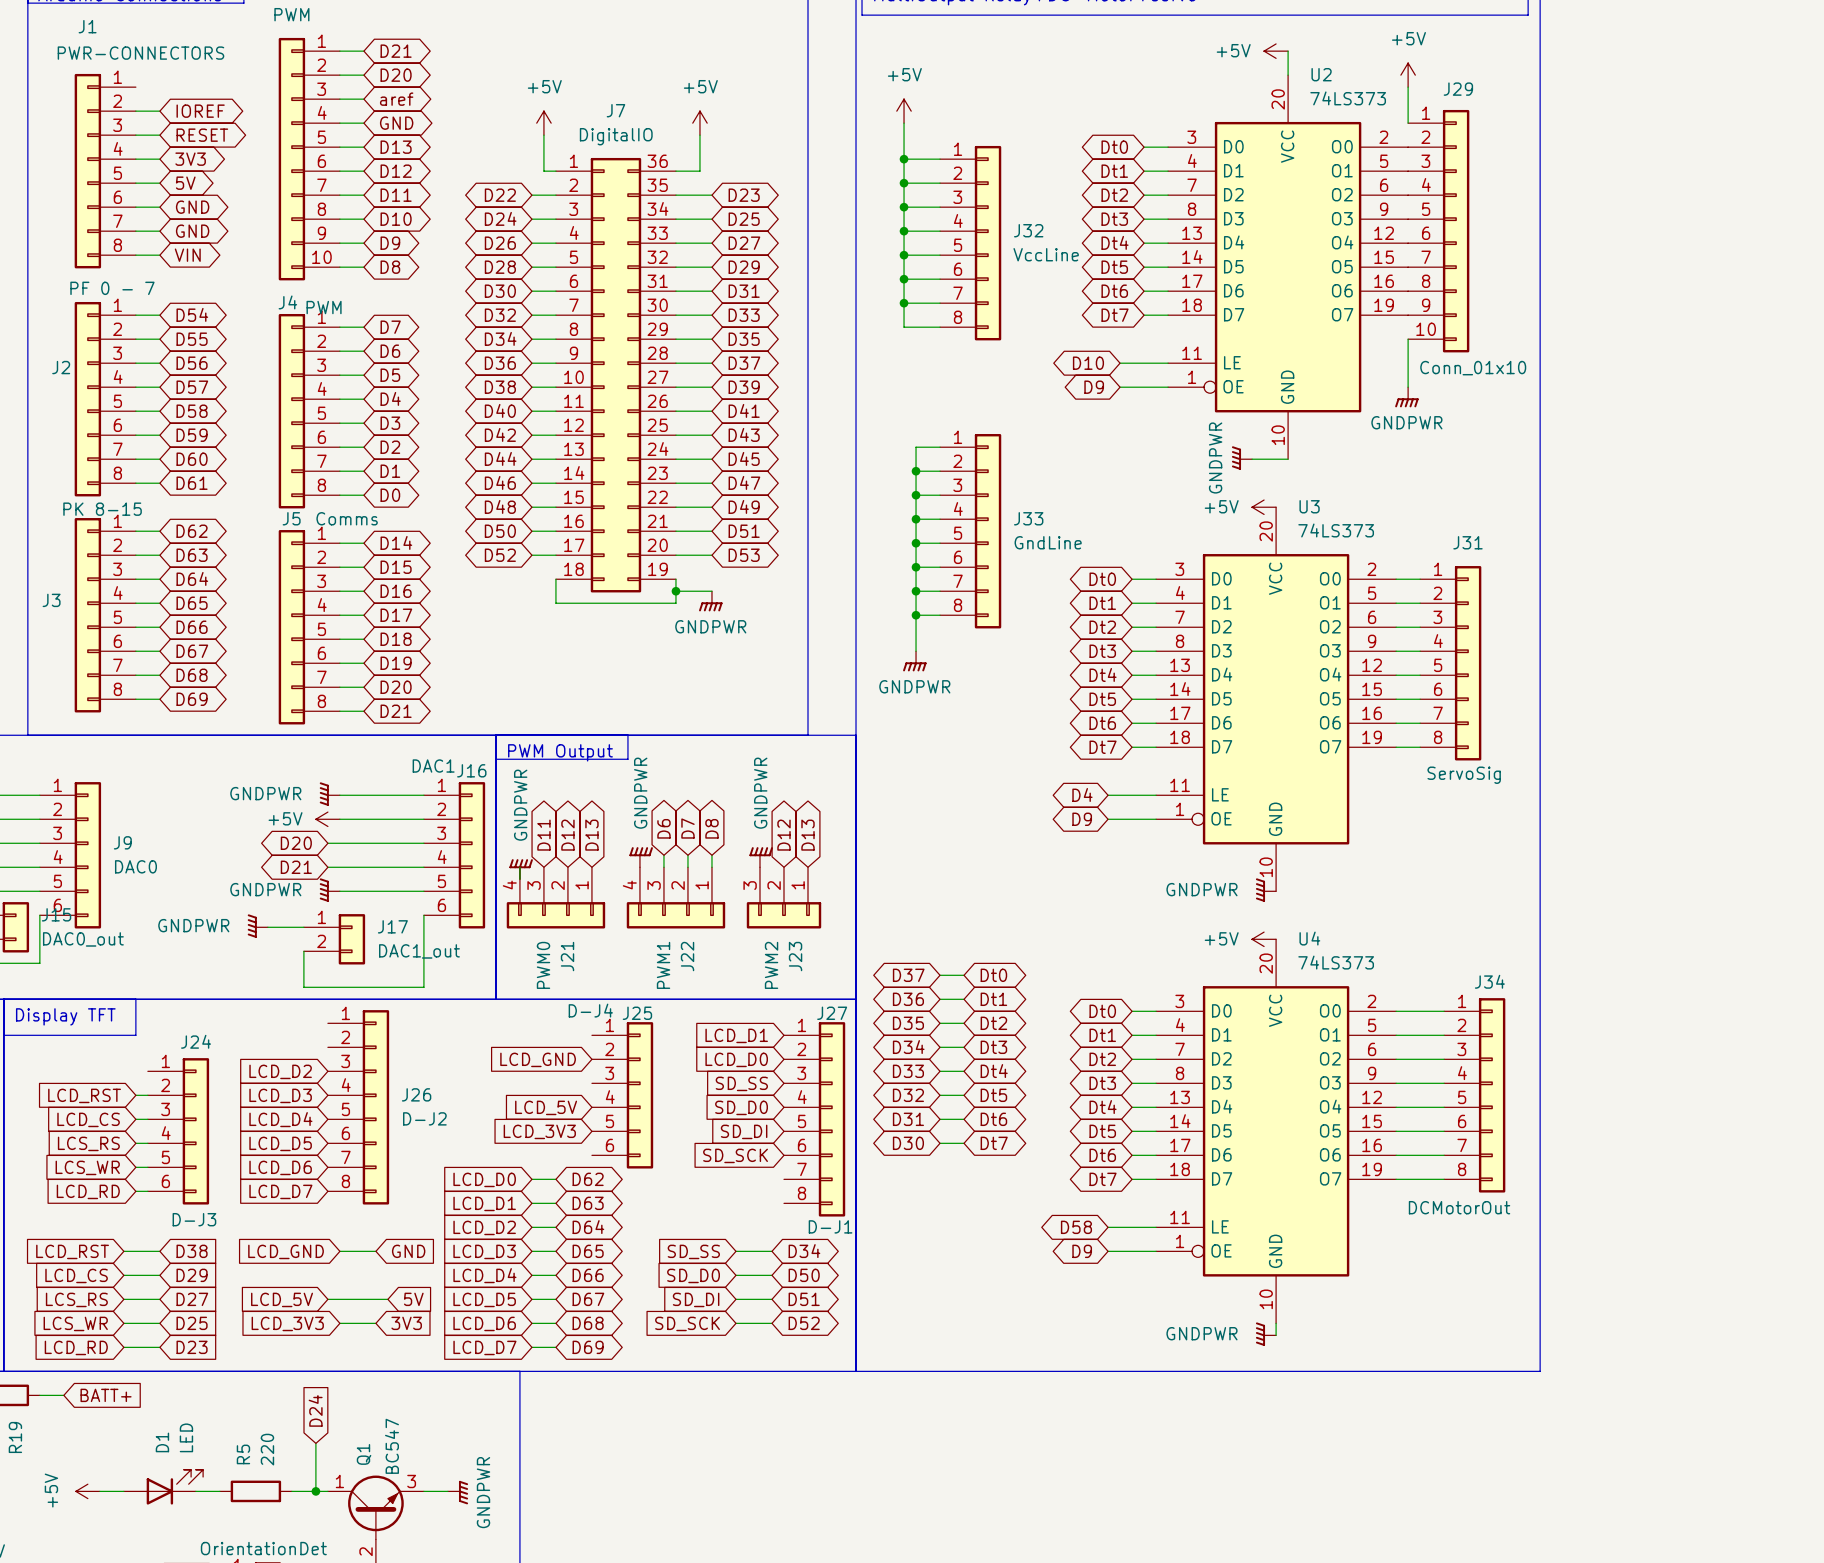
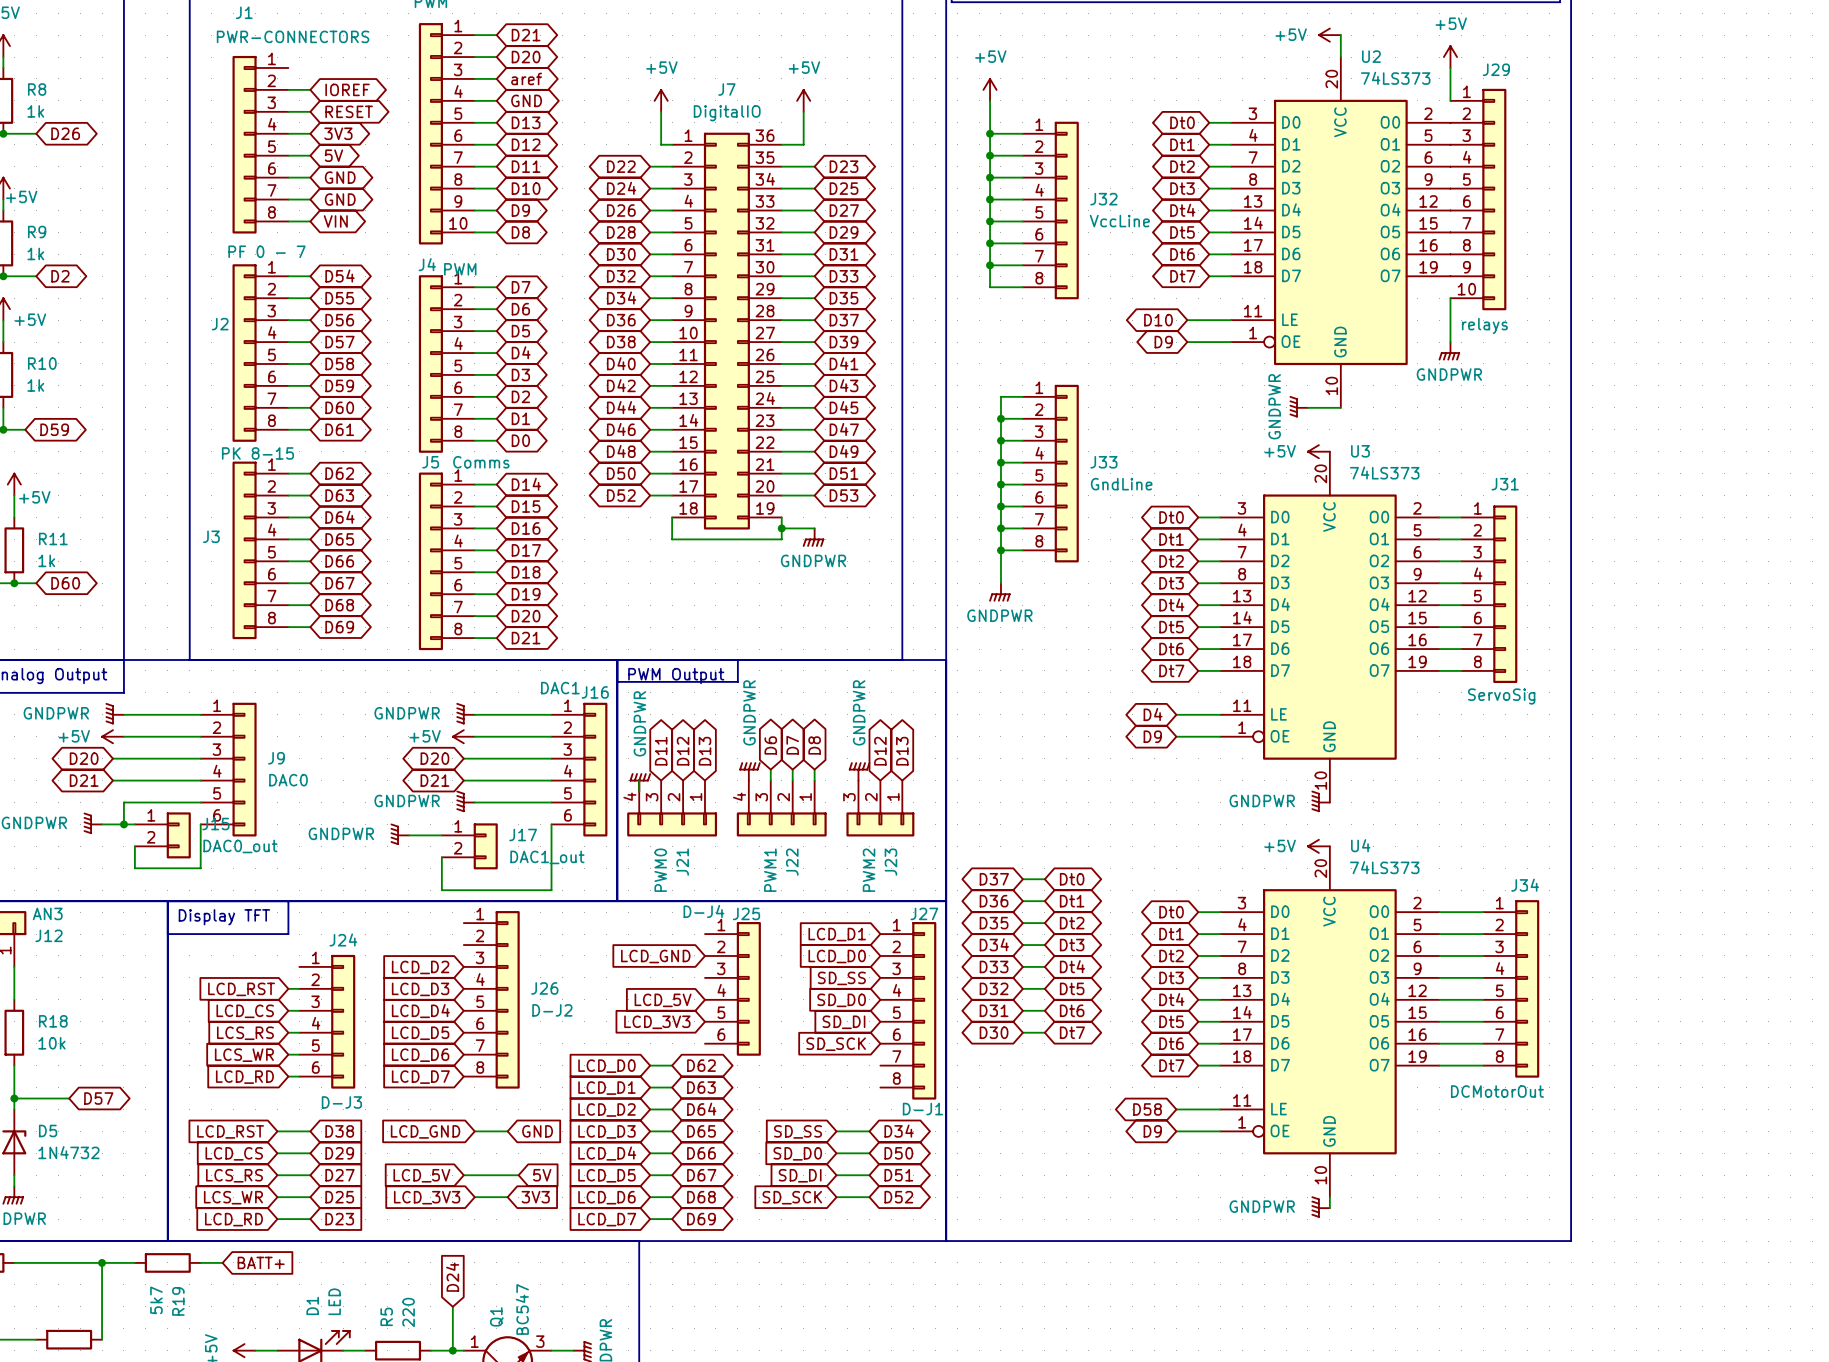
J29 value: Conn_01x10 (1473, 368) -> relays (1484, 325)

